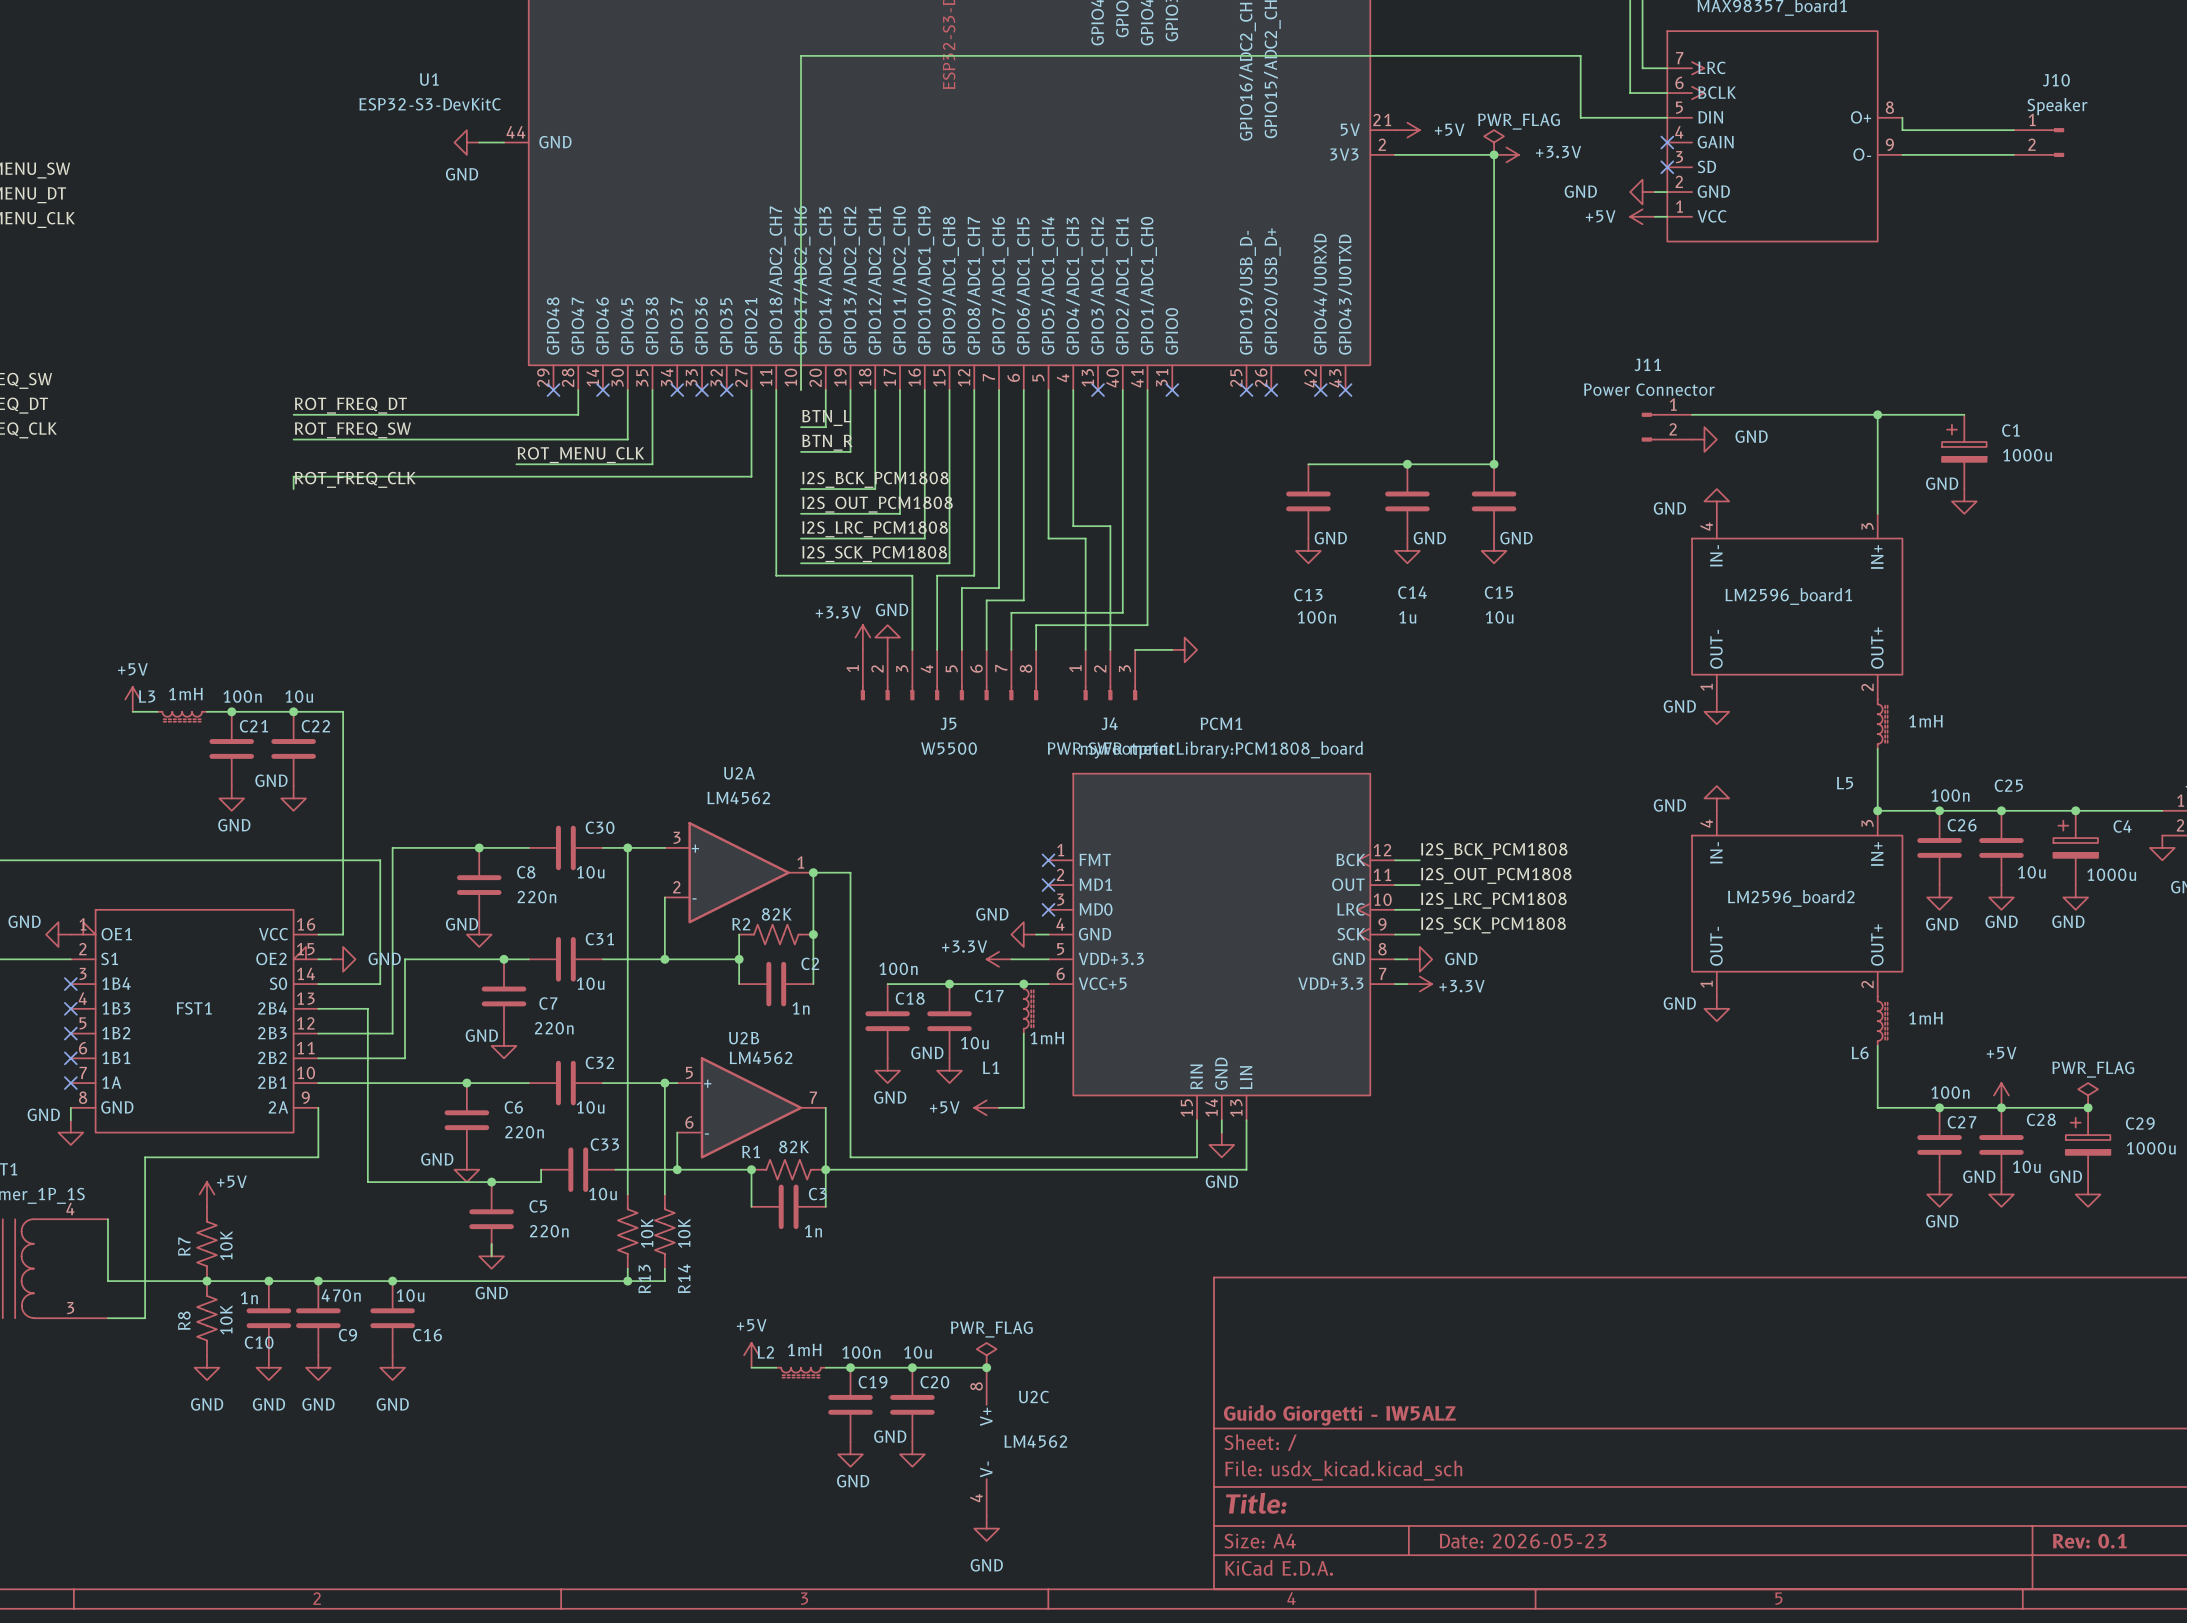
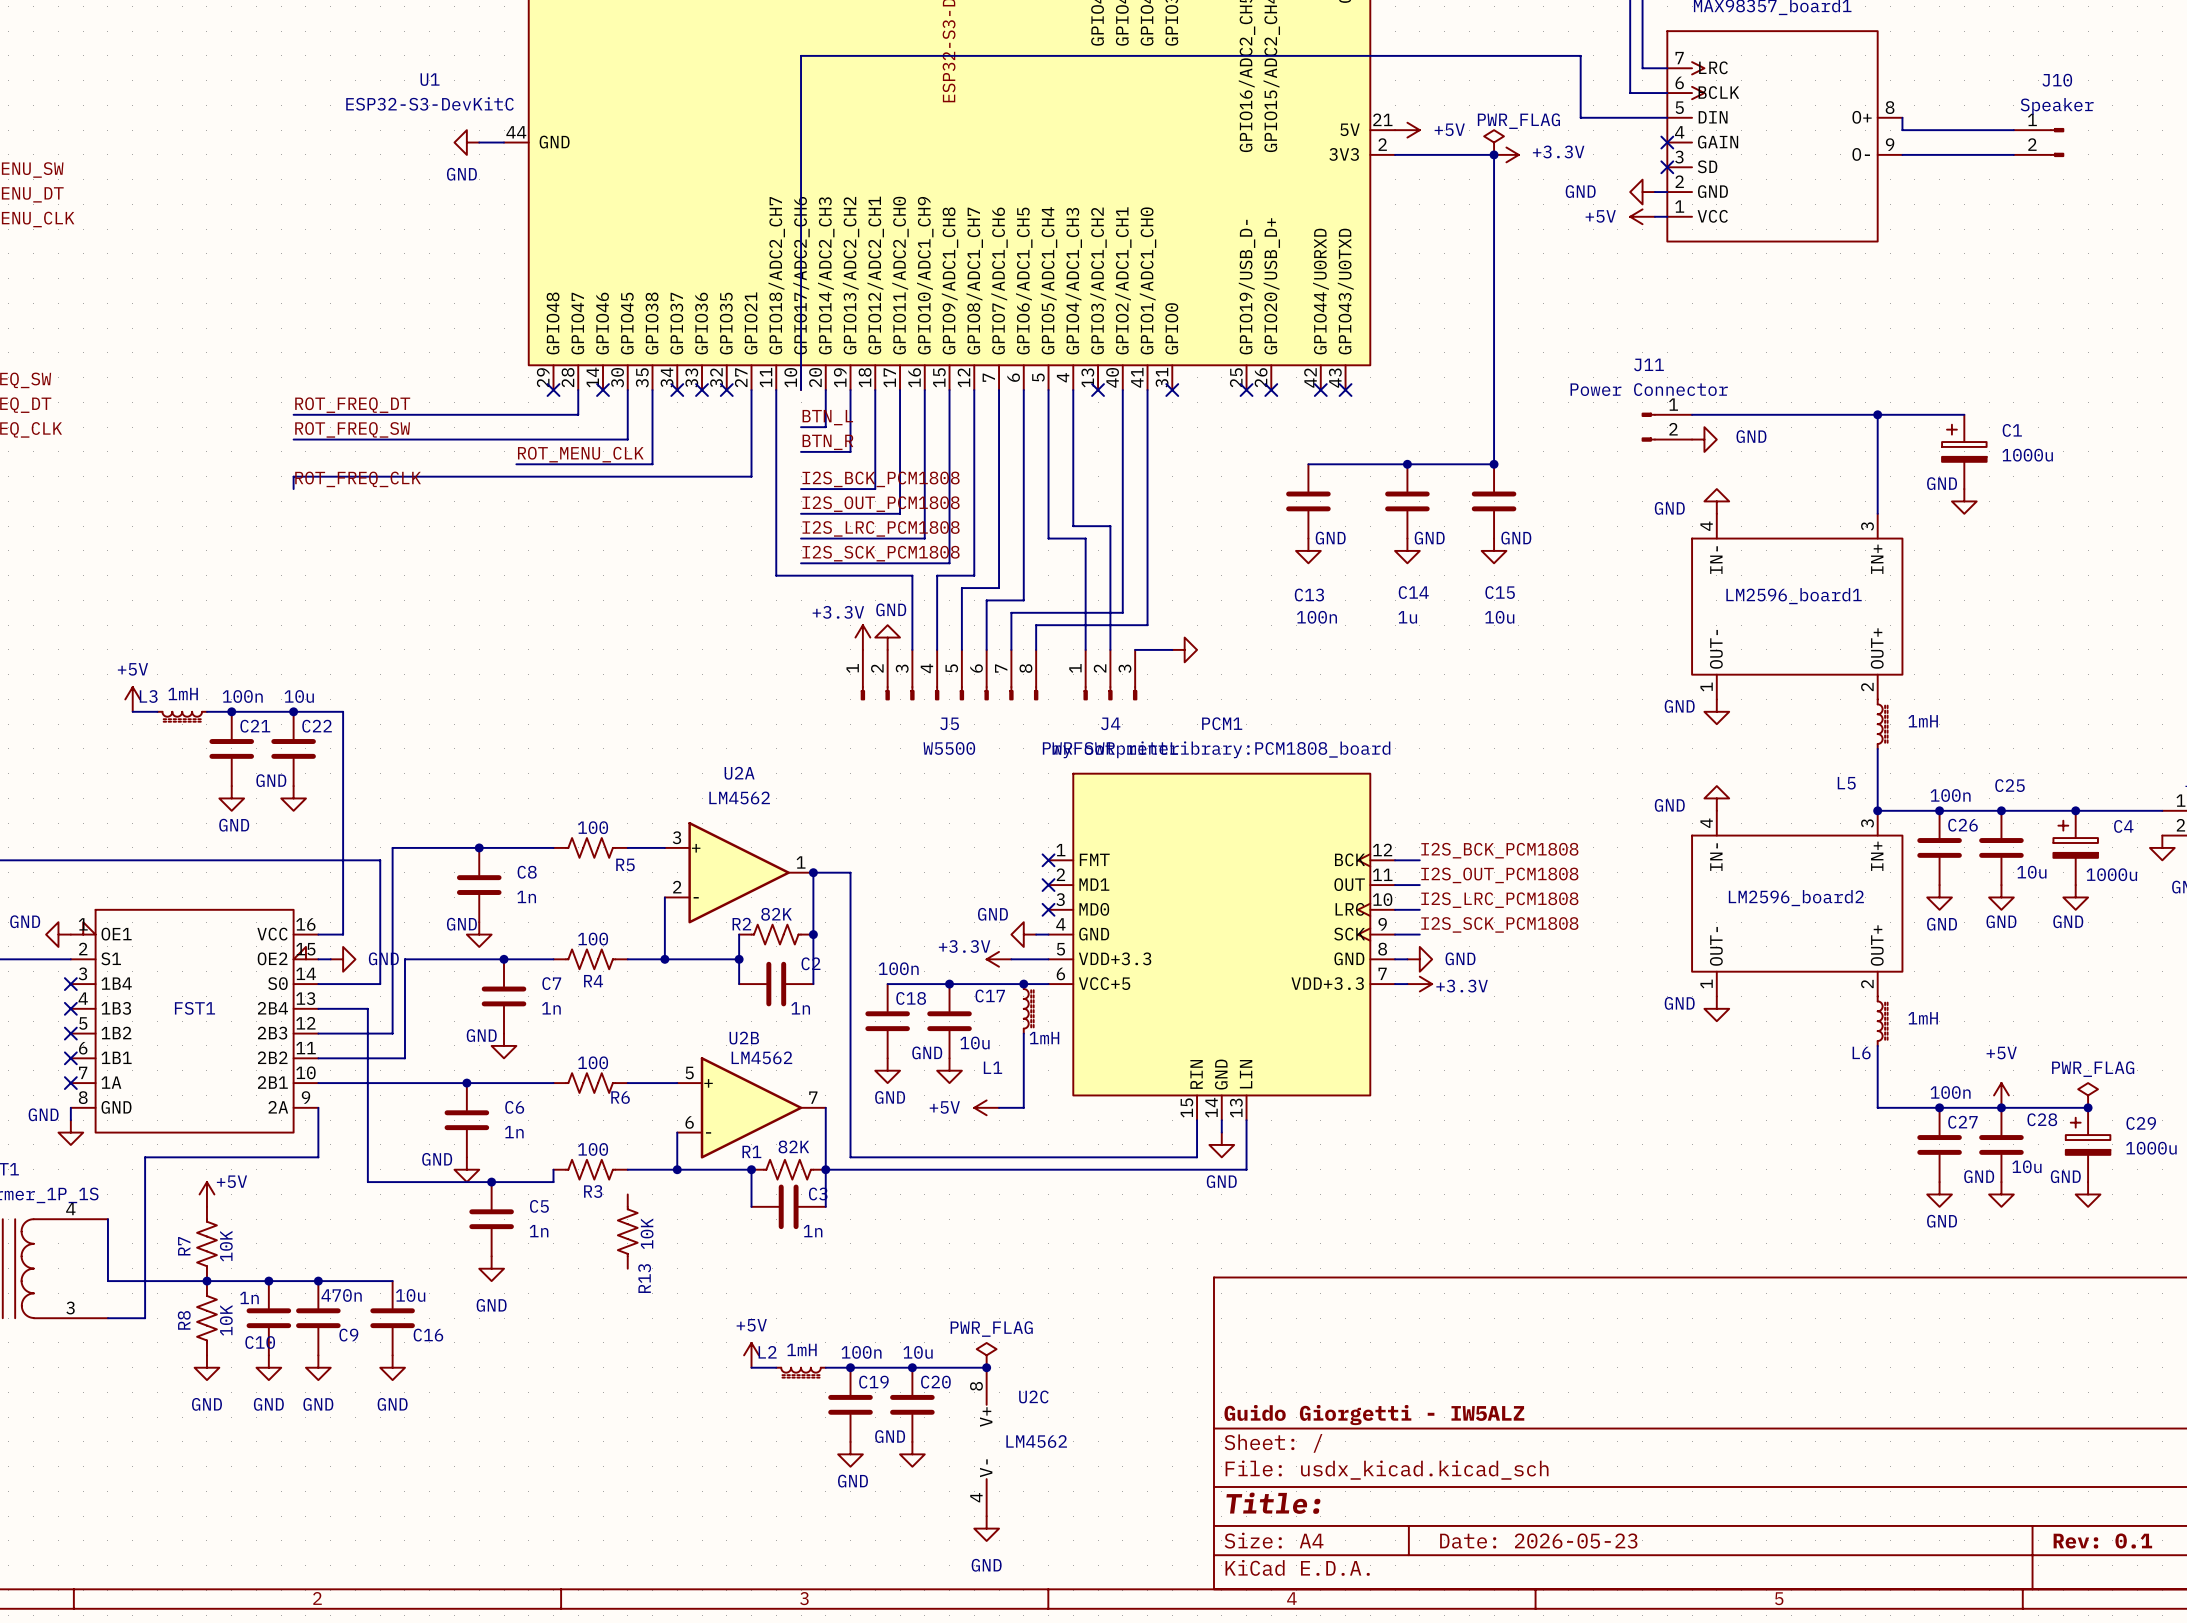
C30: 10u (565, 847) -> none
R5: none -> 100 (590, 847)
wire: (603, 847) (627, 847) (627, 1194) -> none
junction: (627, 847) -> none
C8 value: 220n (536, 897) -> 1n (526, 896)
C31: 10u (565, 959) -> none
R4: none -> 100 (590, 959)
C7 name position: C7 (548, 1003) -> C7 (551, 983)
C7 value: 220n (554, 1028) -> 1n (551, 1008)
C32: 10u (565, 1083) -> none
R6: none -> 100 (590, 1083)
wire: (664, 1083) (664, 1194) -> none
junction: (664, 1083) -> none
C6 value: 220n (524, 1132) -> 1n (514, 1132)
wire: (541, 1169) (541, 1182) -> (553, 1169) (553, 1182) (541, 1182)
C33: 10u (578, 1169) -> none
R3: none -> 100 (590, 1169)
C5 value: 220n (549, 1231) -> 1n (539, 1231)
R14: 10K (664, 1231) -> none
power symbol position: GND (491, 1256) -> GND (491, 1268)
wire: (627, 1268) (627, 1281) -> none
wire: (664, 1268) (664, 1281) (392, 1281) -> none
junction: (392, 1281) -> none
junction: (627, 1281) -> none

